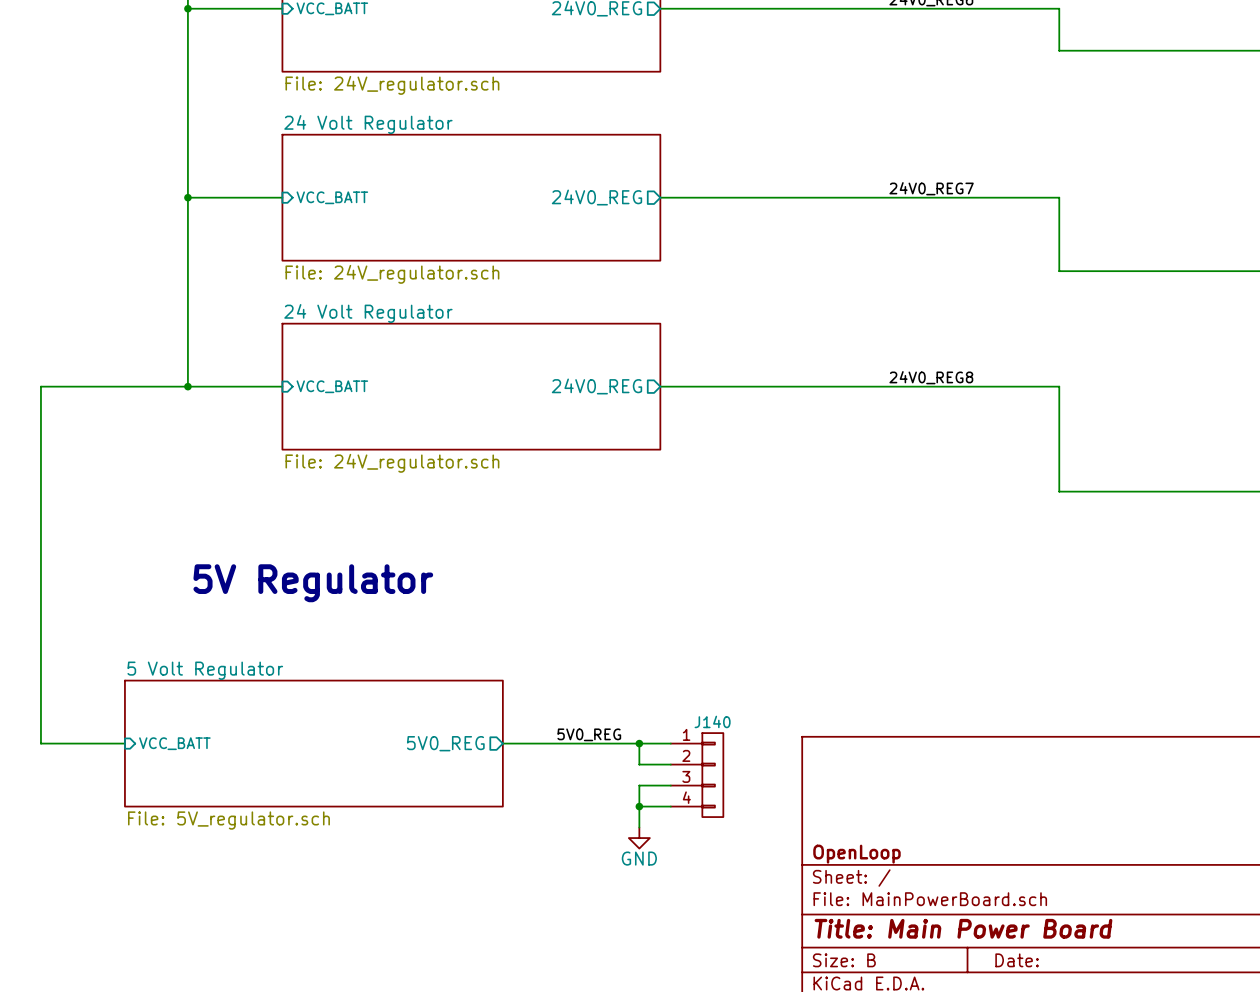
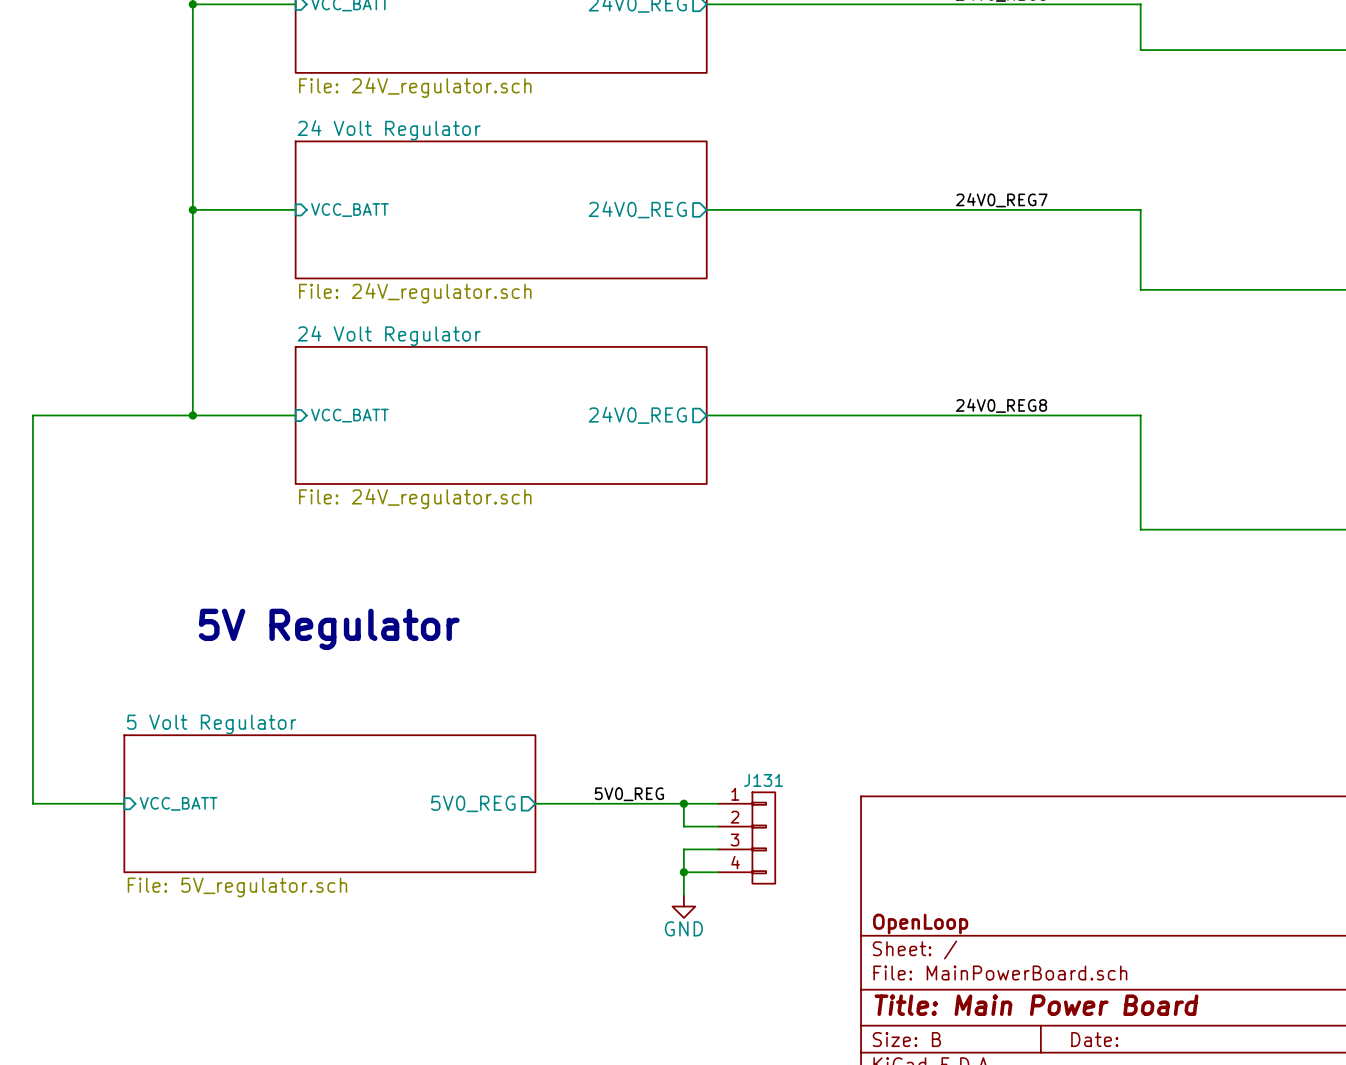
J140 name: J140 (712, 721) -> J131 (763, 780)

